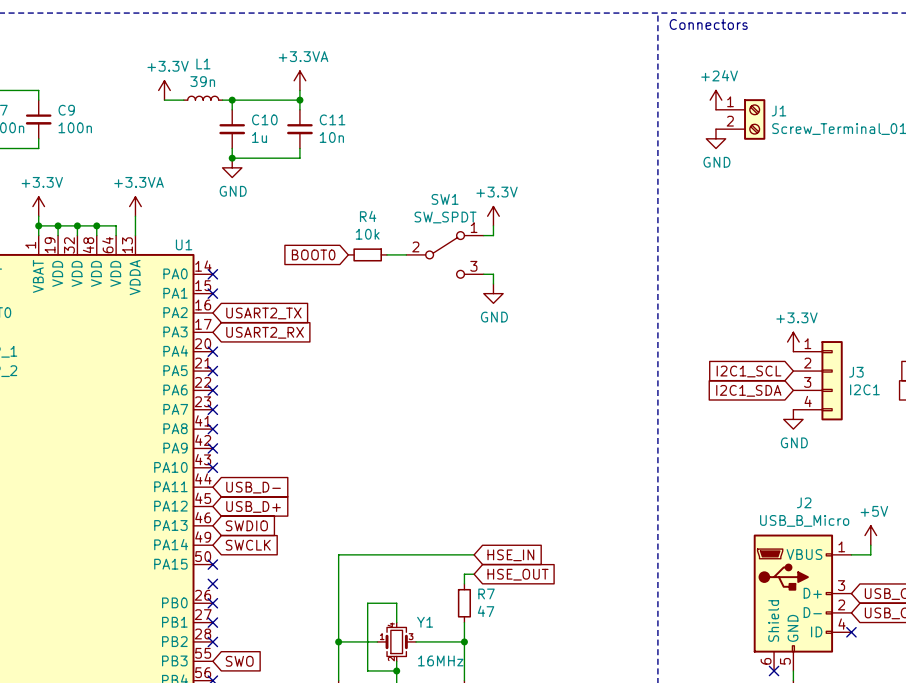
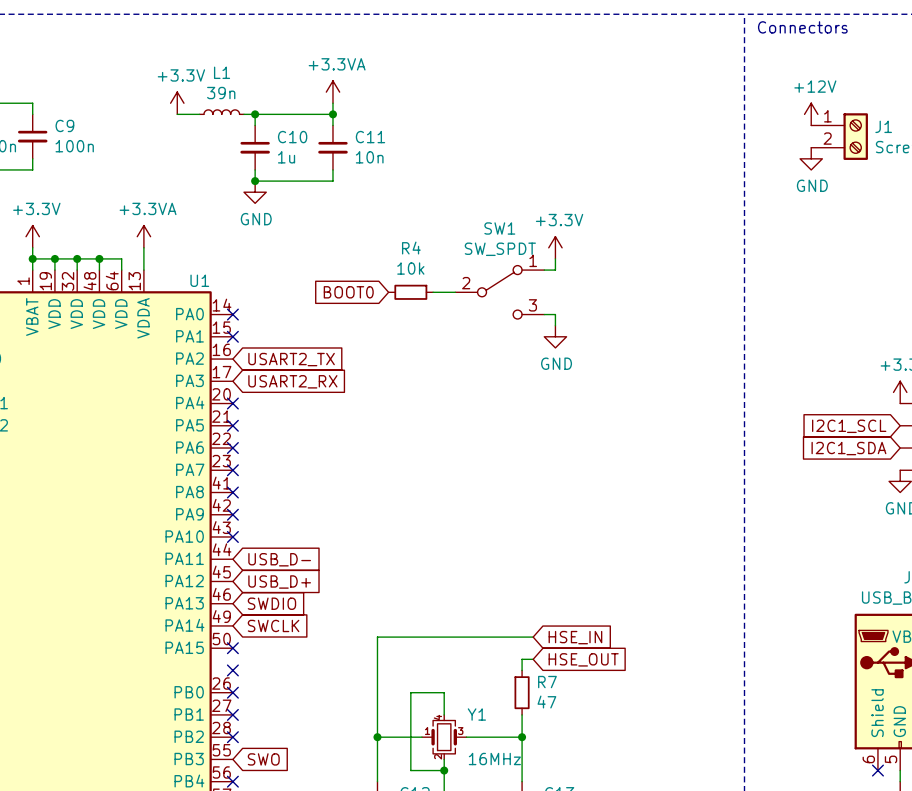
power symbol: +24V (715, 100) -> +12V (811, 114)

